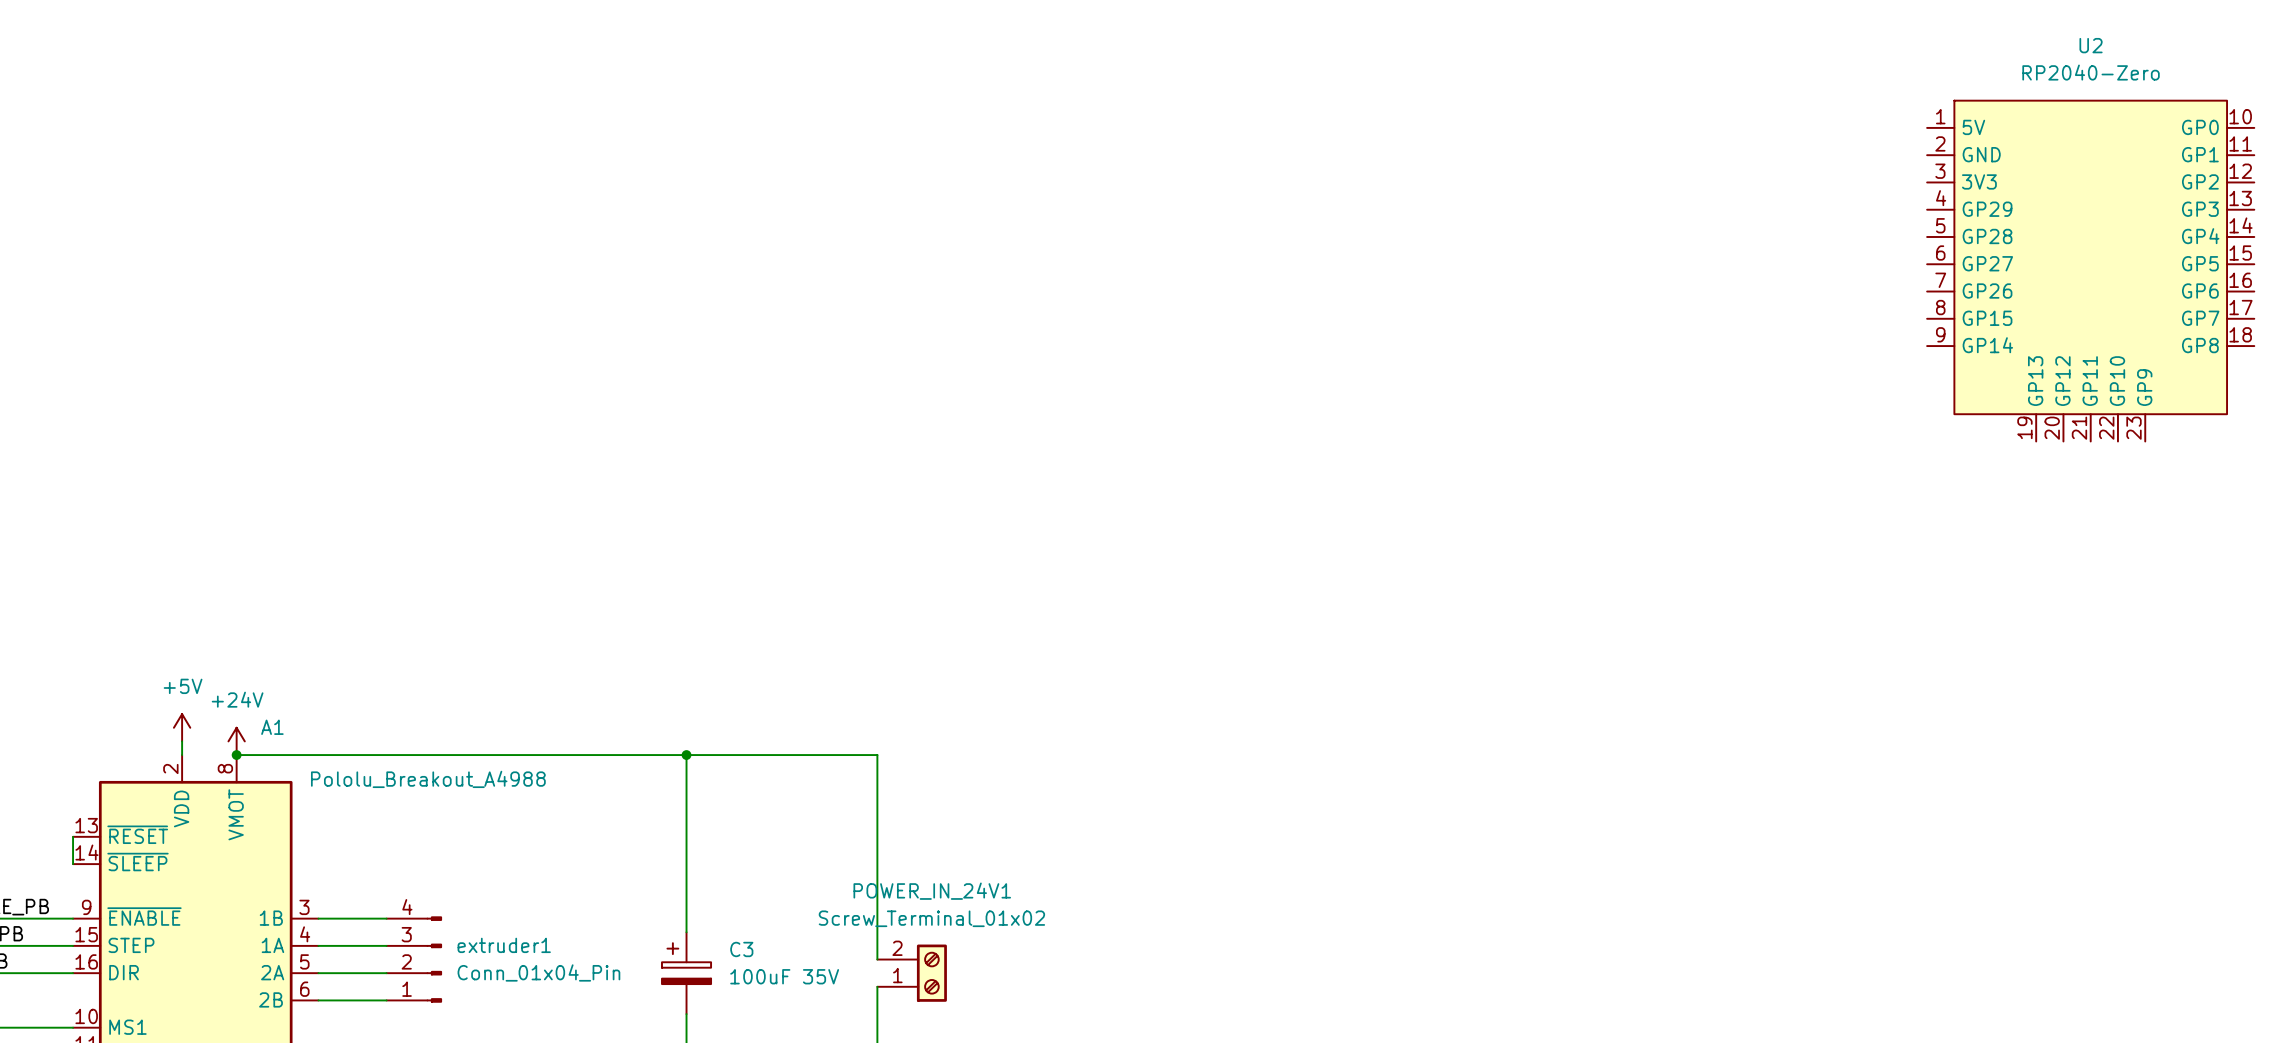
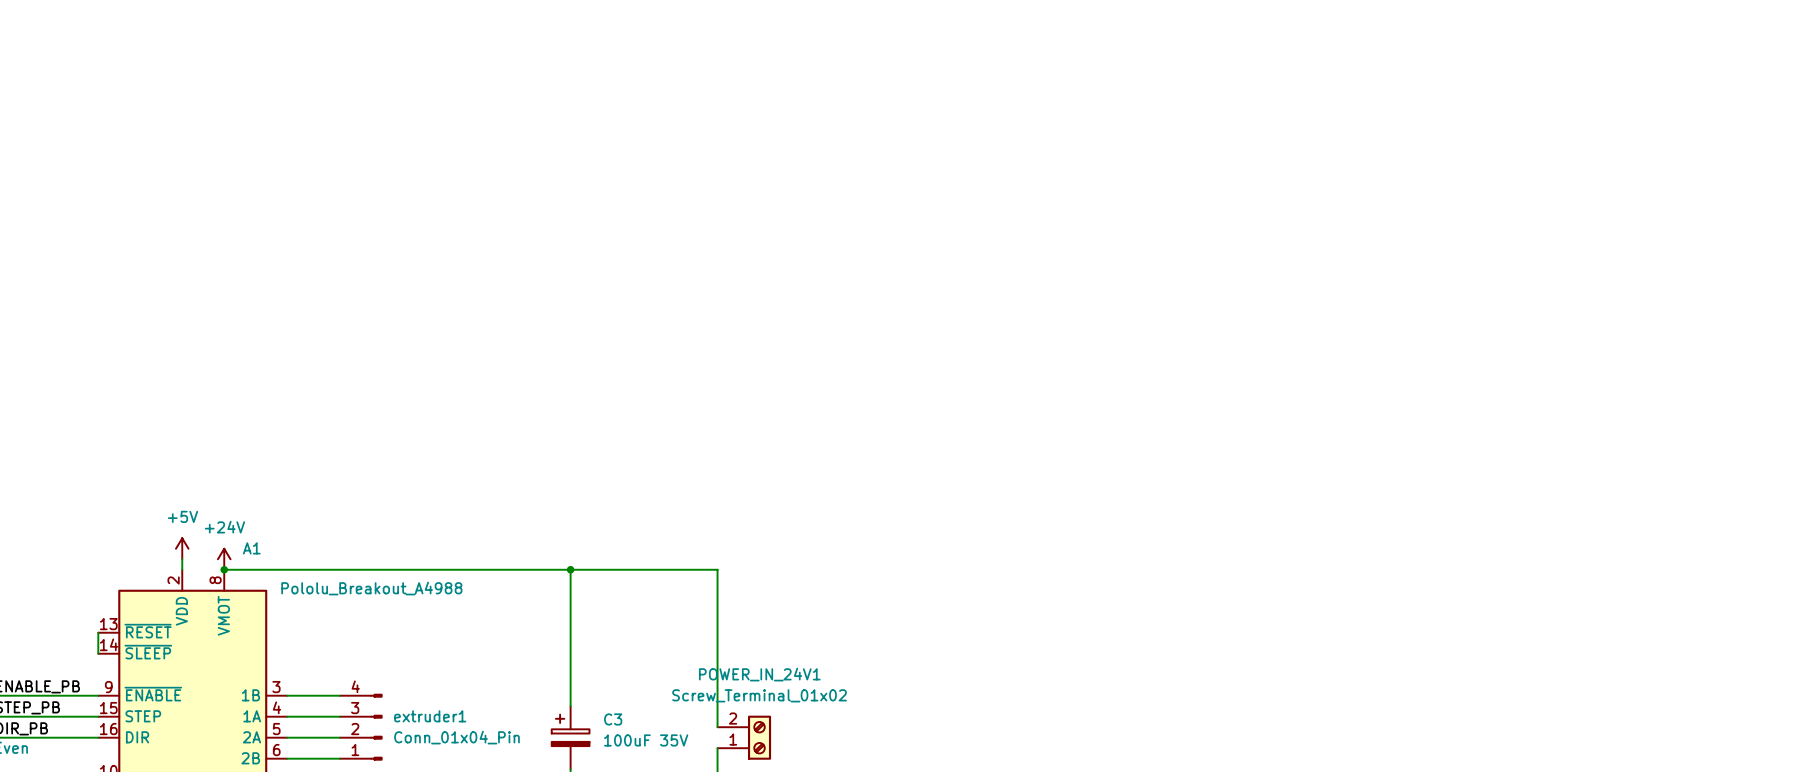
U2: RP2040-Zero (2090, 271) -> none

